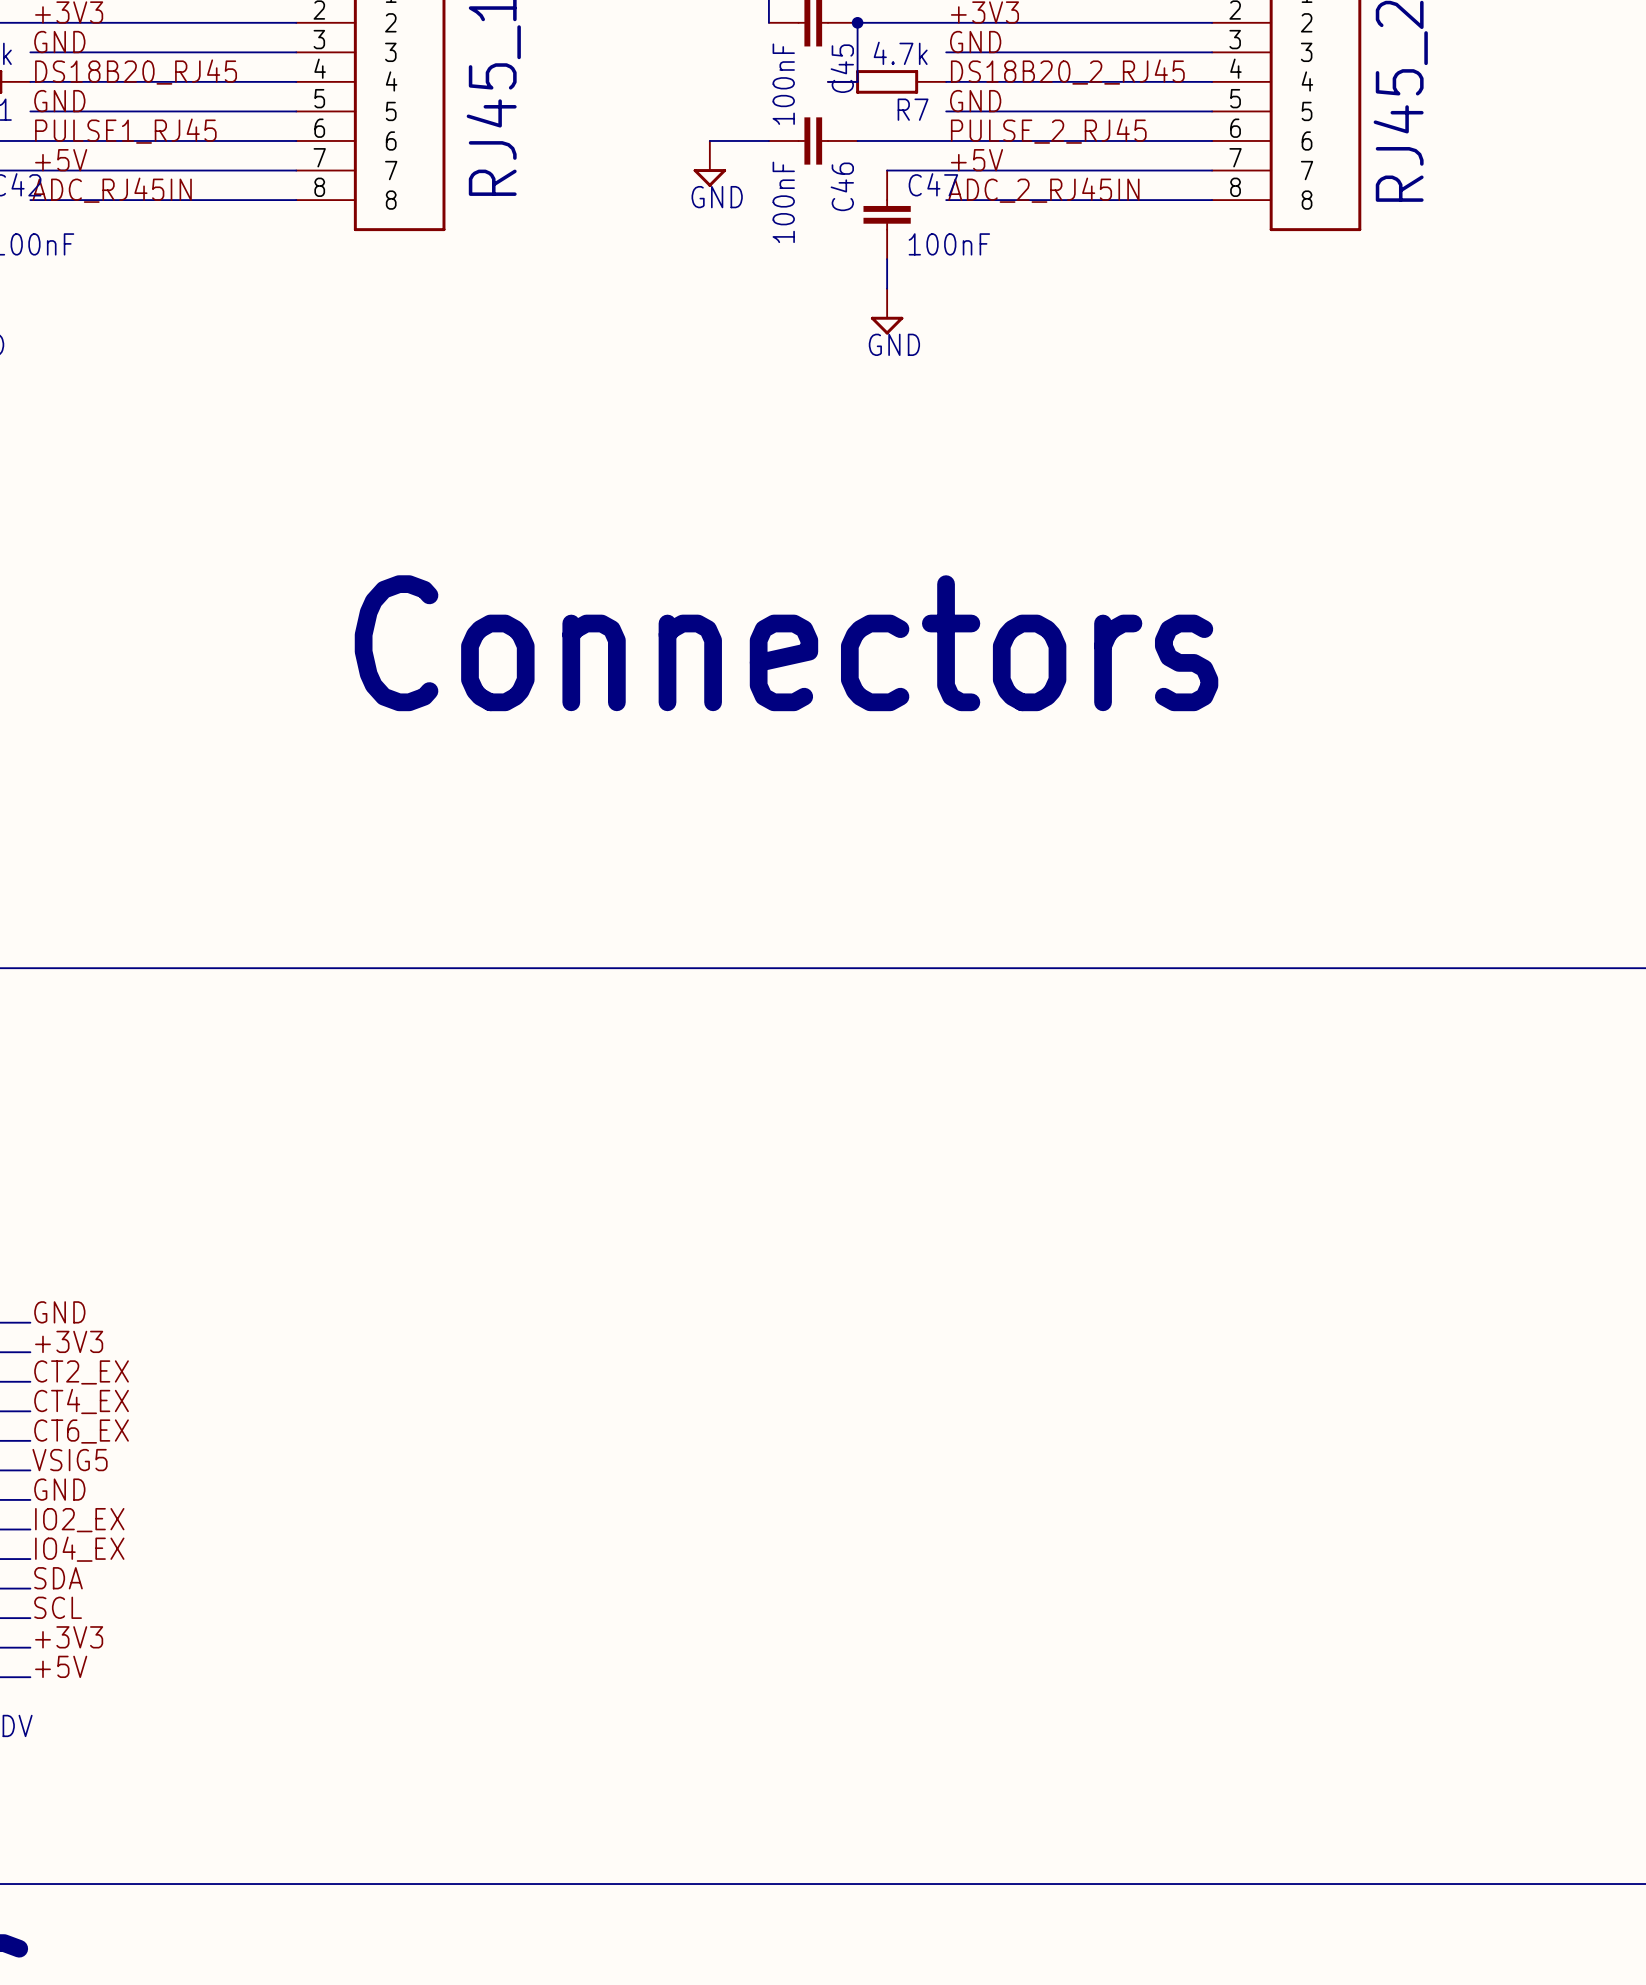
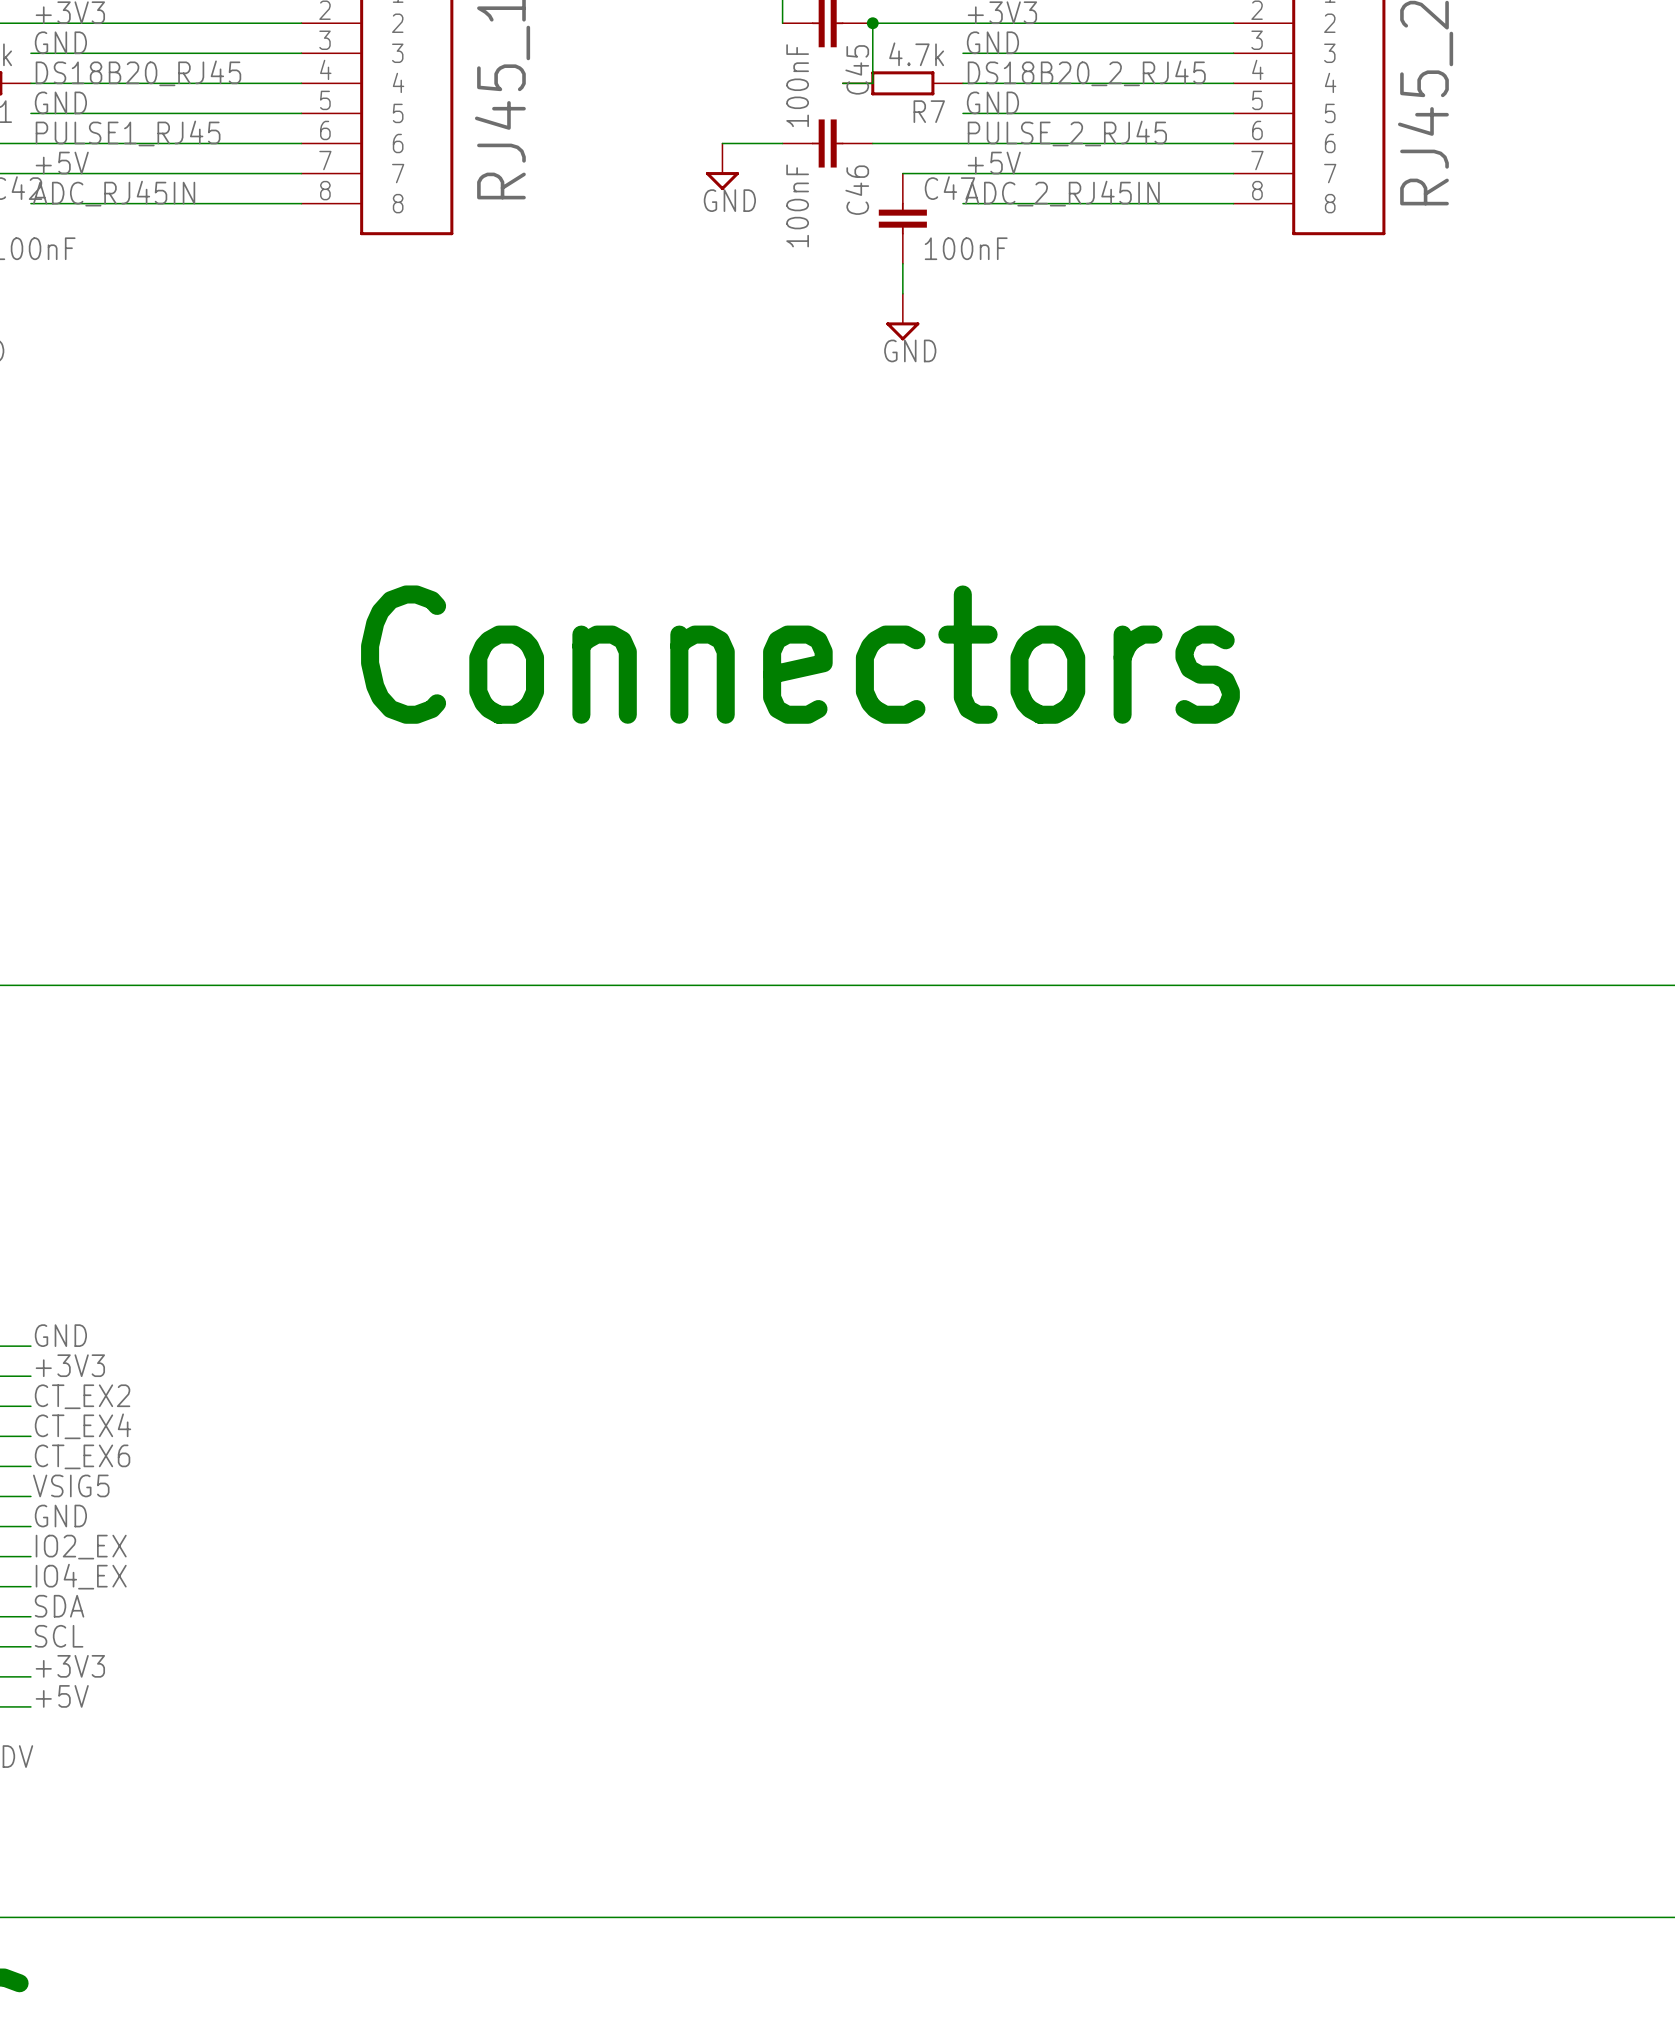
label: CT2_EX (81, 1372) -> CT_EX2 (82, 1396)
label: CT4_EX (81, 1401) -> CT_EX4 (82, 1426)
label: CT6_EX (81, 1431) -> CT_EX6 (82, 1456)

